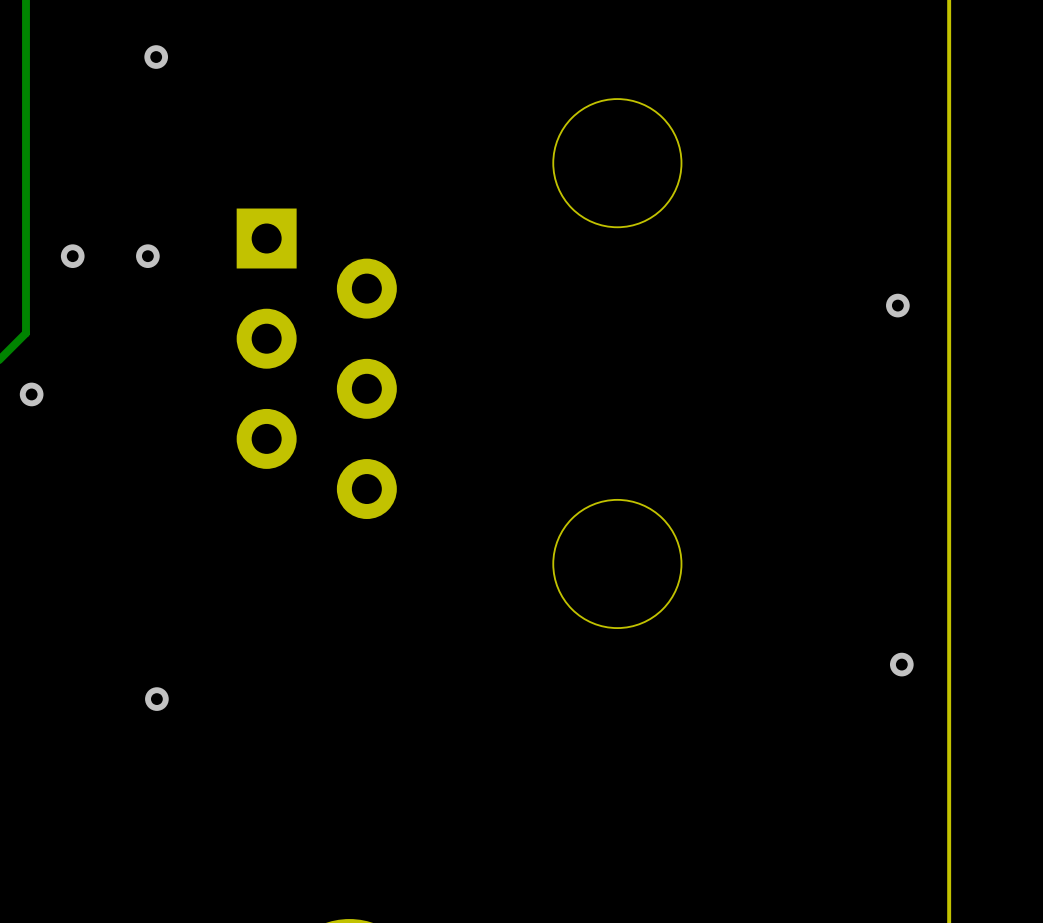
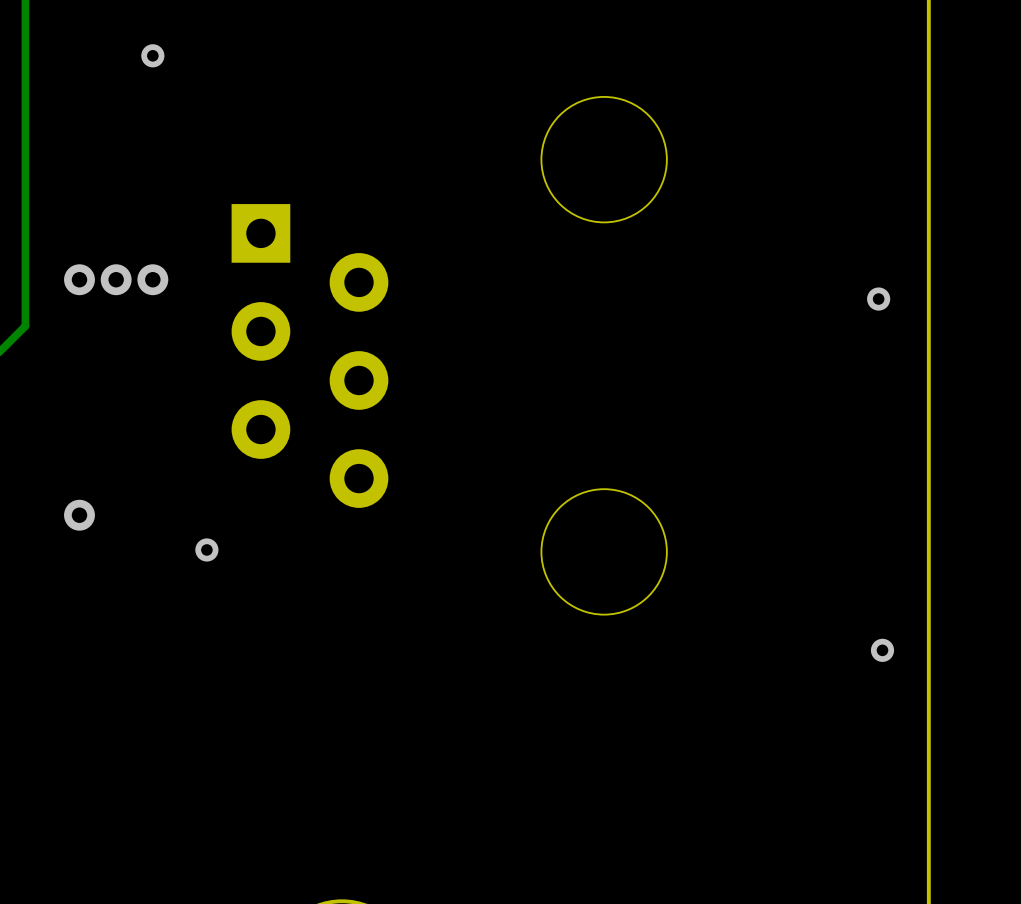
via: (72, 256) -> none
via: (147, 256) -> none
via: none -> (79, 279)
via: none -> (116, 279)
via: none -> (152, 279)
via: (31, 394) -> none
via: none -> (79, 515)
via: none -> (206, 549)
via: (156, 699) -> none

